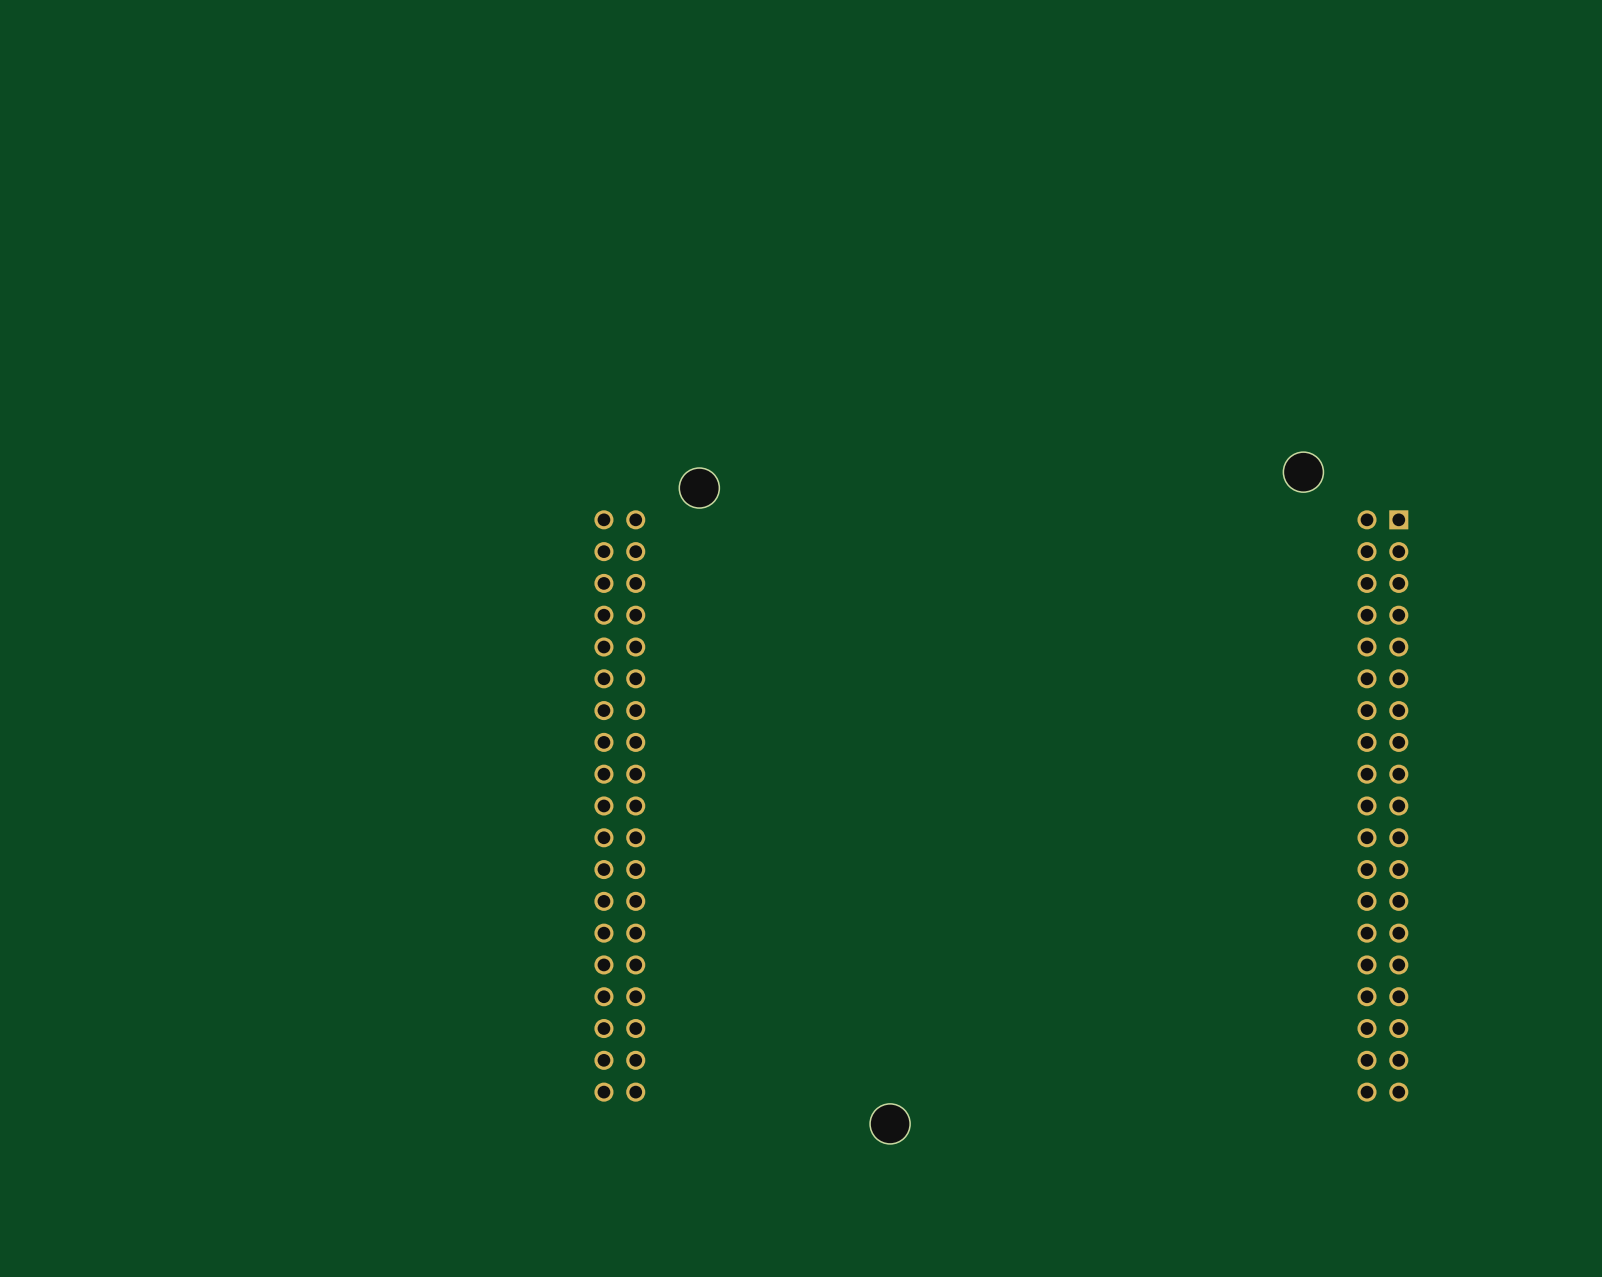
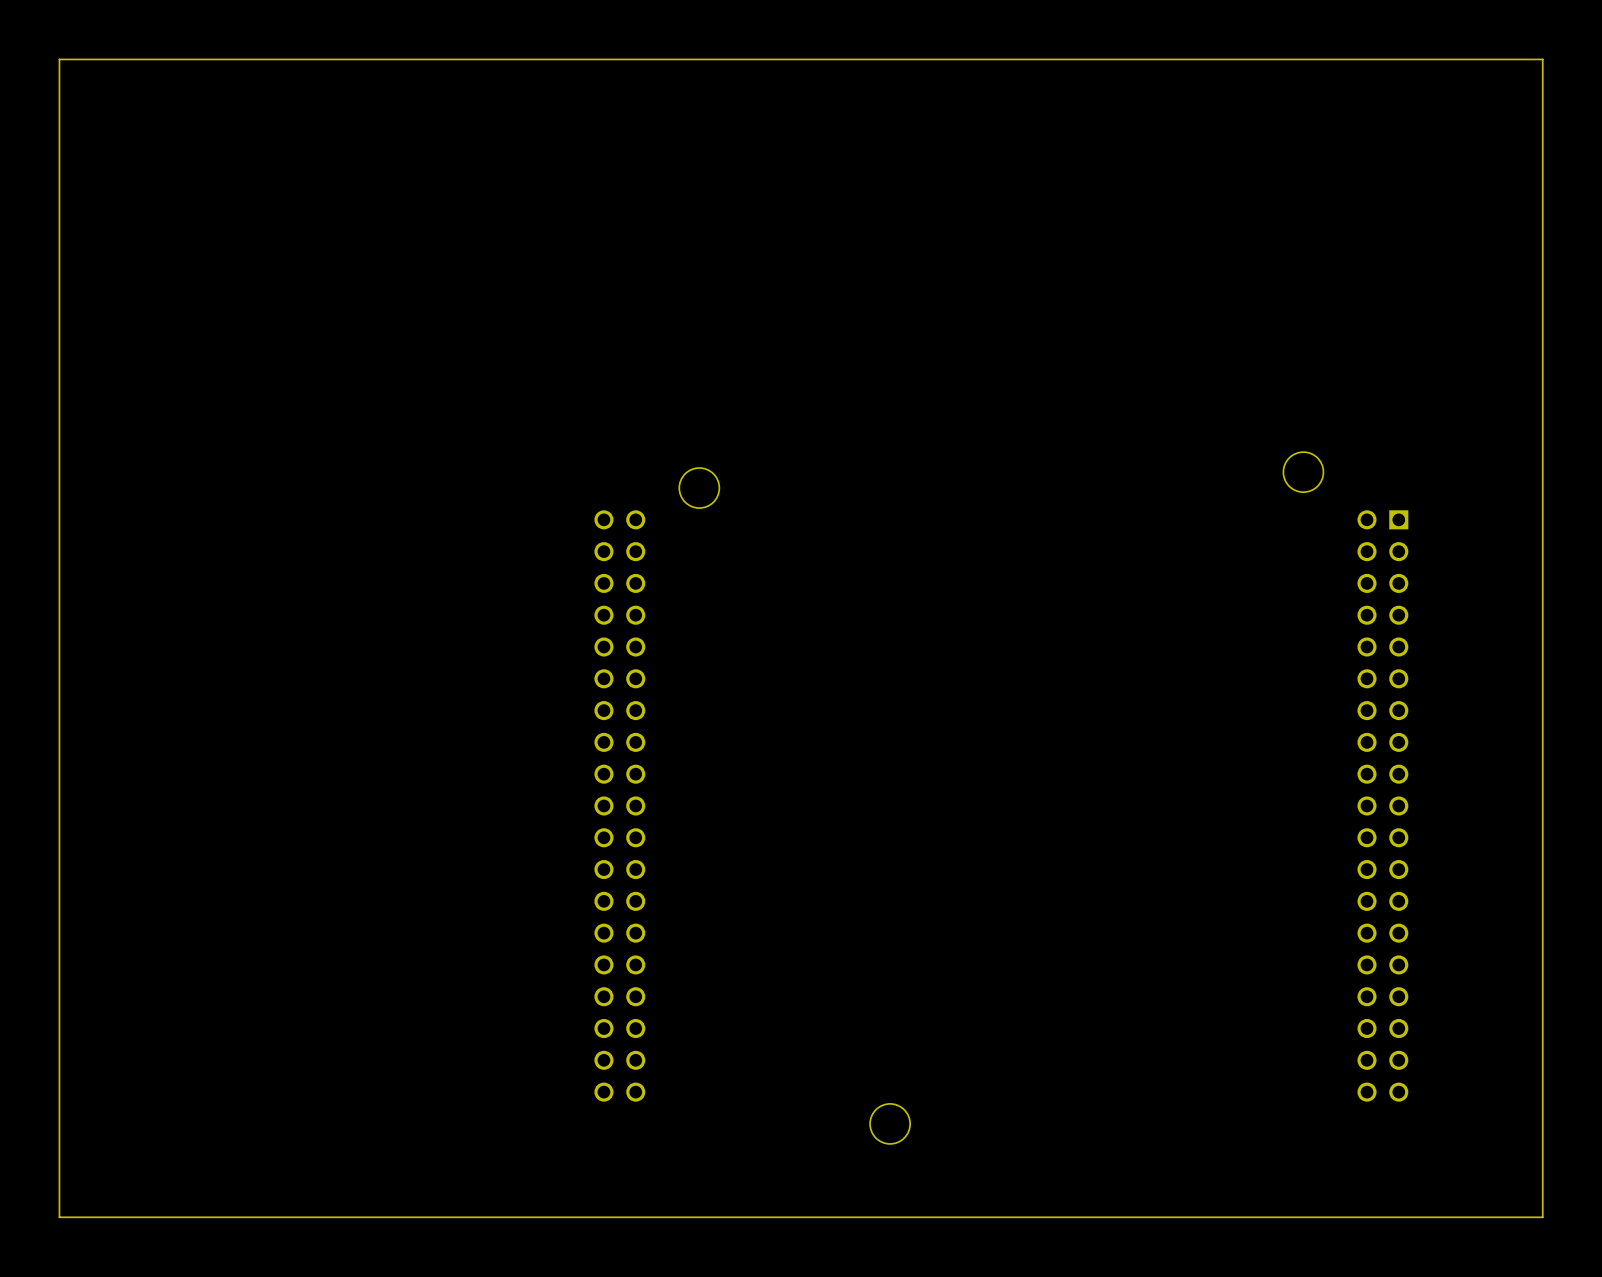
board edge: none -> (1542, 59) (59, 59) (59, 1217) (1542, 1217) (1542, 59)

